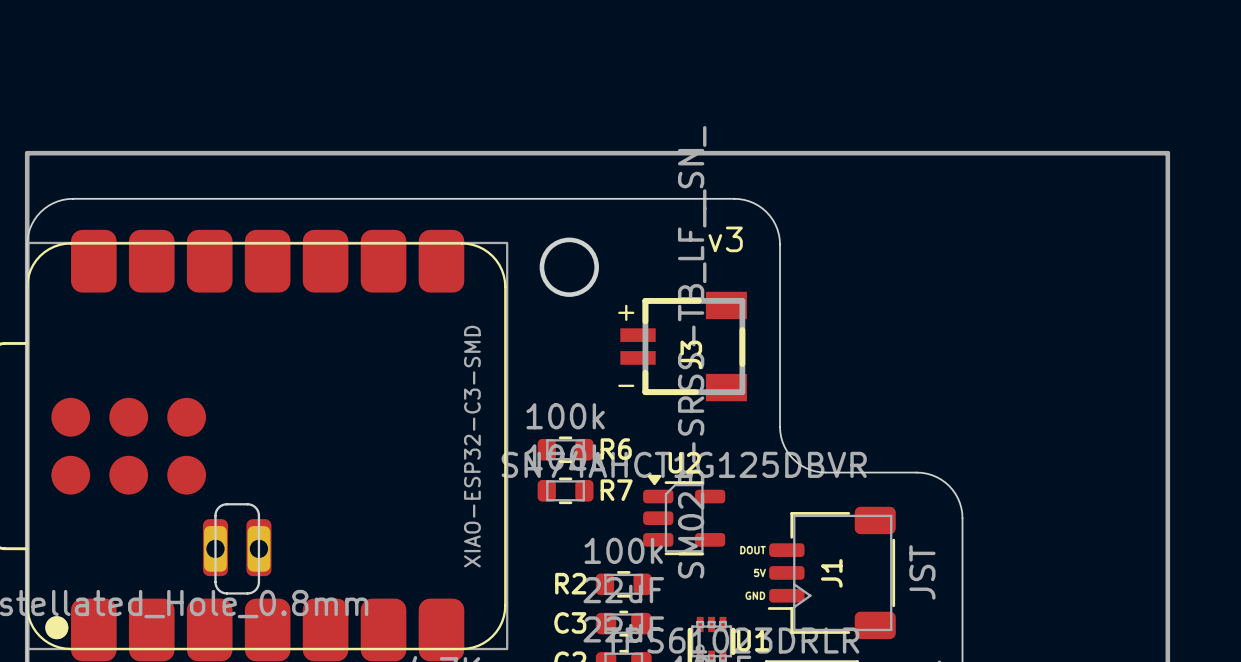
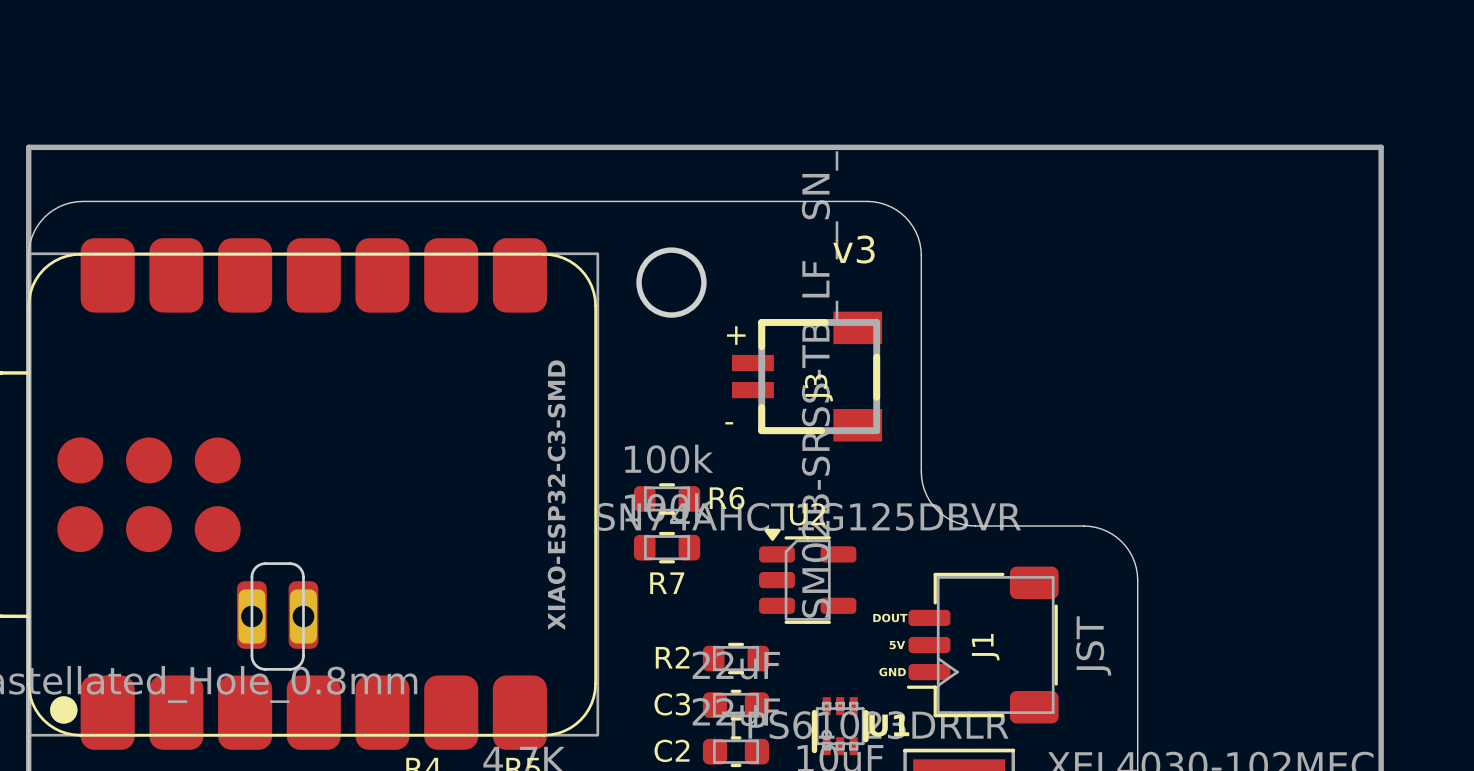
R7 name position: R7 (616, 490) -> R7 (667, 583)
R2 value: 100k (623, 550) -> none

